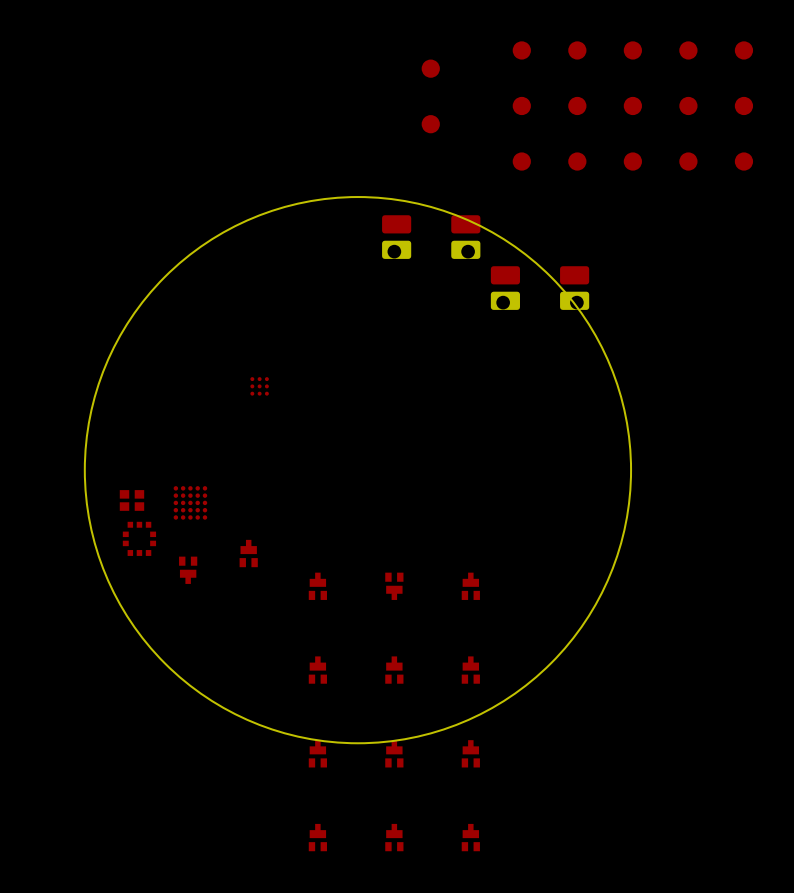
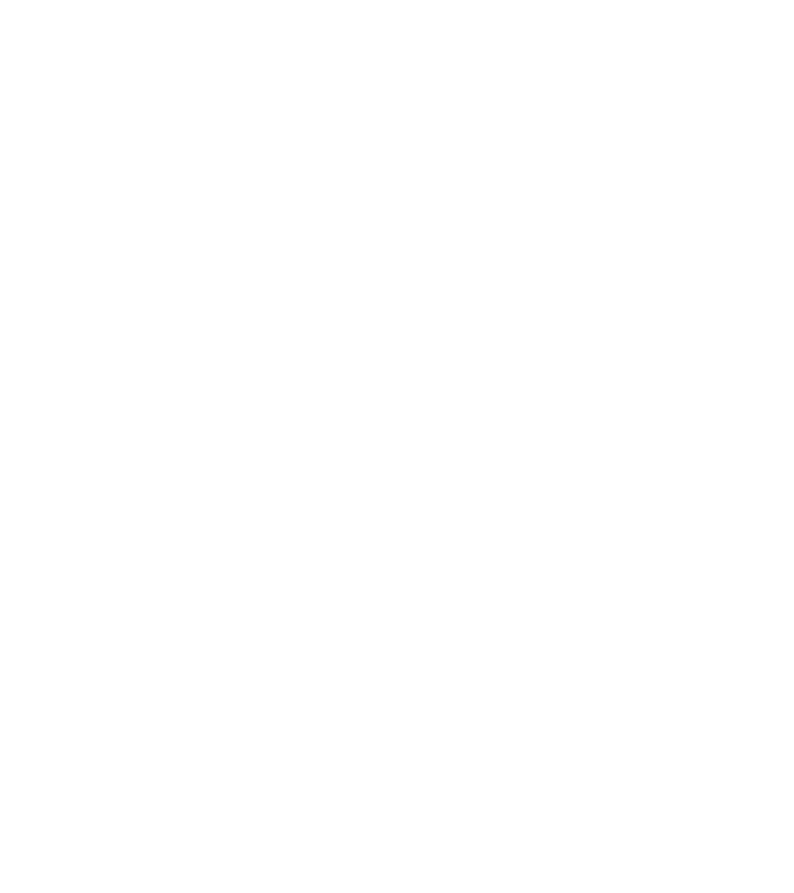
part: (521, 50) -> none
part: (577, 50) -> none
part: (632, 50) -> none
part: (688, 50) -> none
part: (743, 50) -> none
part: (430, 68) -> none
part: (521, 105) -> none
part: (577, 105) -> none
part: (632, 105) -> none
part: (688, 105) -> none
part: (743, 105) -> none
part: (430, 124) -> none
part: (521, 161) -> none
part: (577, 161) -> none
part: (632, 161) -> none
part: (688, 161) -> none
part: (743, 161) -> none
round board edge: [84, 196, 632, 744] -> none
part: (431, 237) -> none
part: (540, 288) -> none
part: (259, 386) -> none
part: (131, 500) -> none
part: (190, 502) -> none
part: (139, 538) -> none
part: (248, 553) -> none
part: (188, 570) -> none
part: (317, 586) -> none
part: (394, 586) -> none
part: (470, 586) -> none
part: (317, 670) -> none
part: (394, 670) -> none
part: (470, 670) -> none
part: (317, 753) -> none
part: (394, 753) -> none
part: (470, 753) -> none
part: (317, 837) -> none
part: (394, 837) -> none
part: (470, 837) -> none

